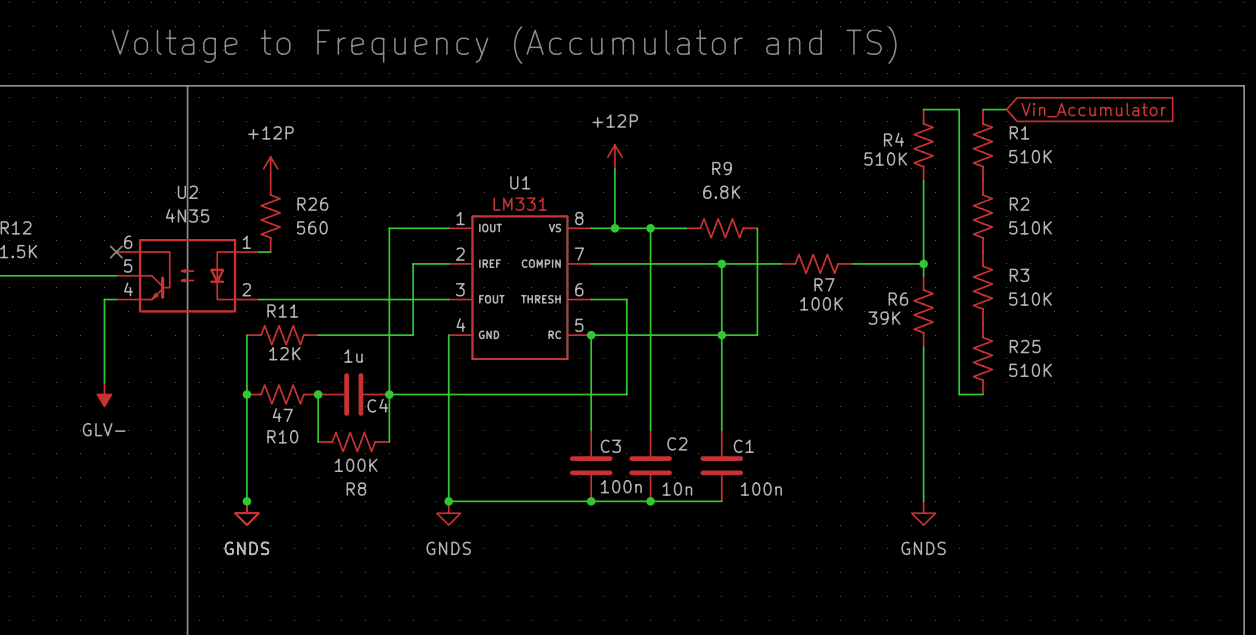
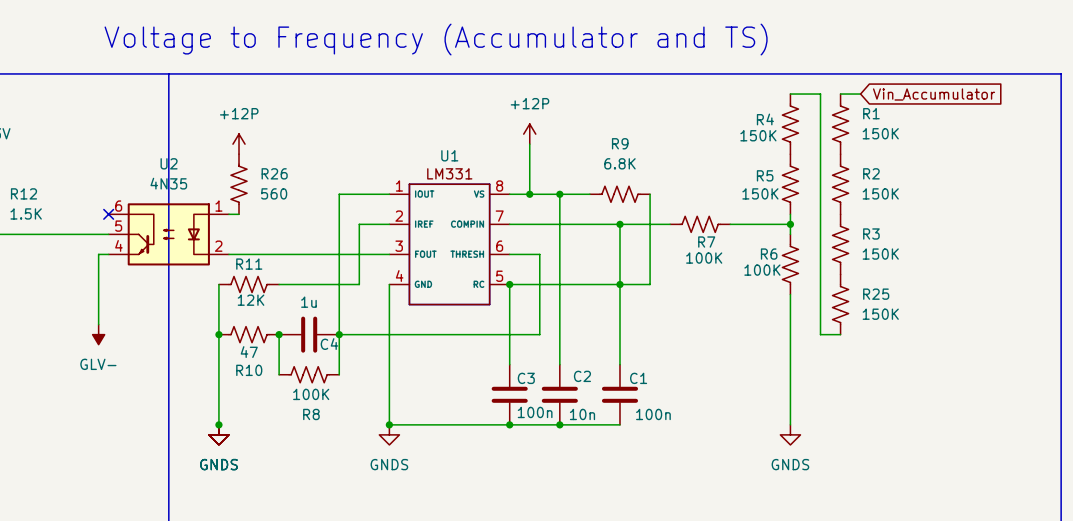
R1 value: 510K (1030, 156) -> 150K (880, 133)
R4 value: 510K (885, 159) -> 150K (758, 135)
R5: none -> 150K (790, 184)
R2 value: 510K (1030, 227) -> 150K (880, 193)
R3 value: 510K (1030, 299) -> 150K (880, 254)
R6 value: 39K (884, 318) -> 100K (762, 270)
R25 value: 510K (1030, 370) -> 150K (880, 314)

